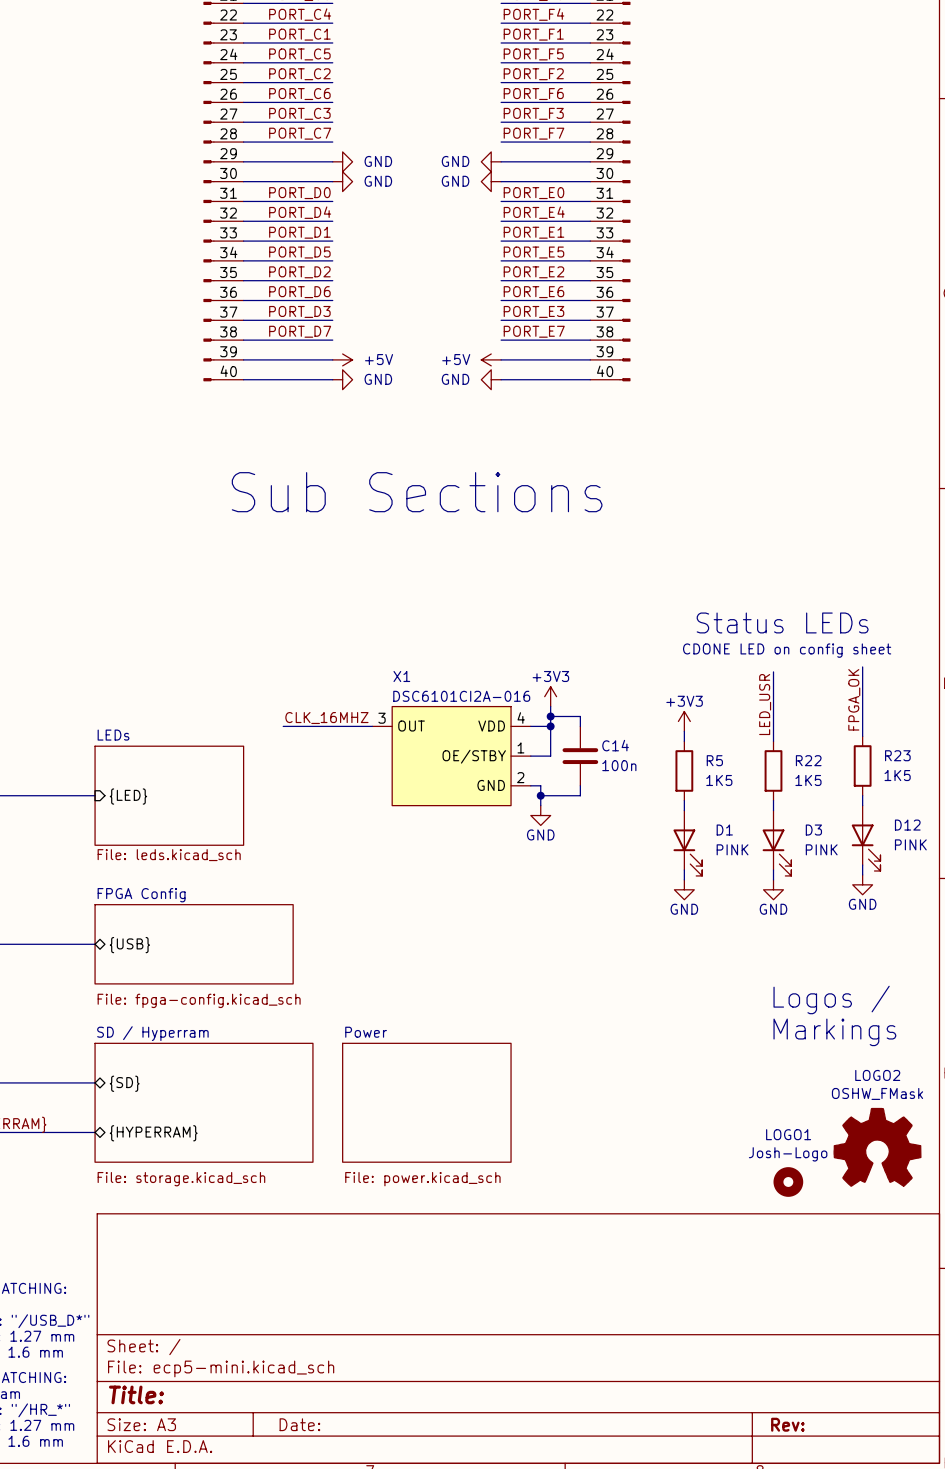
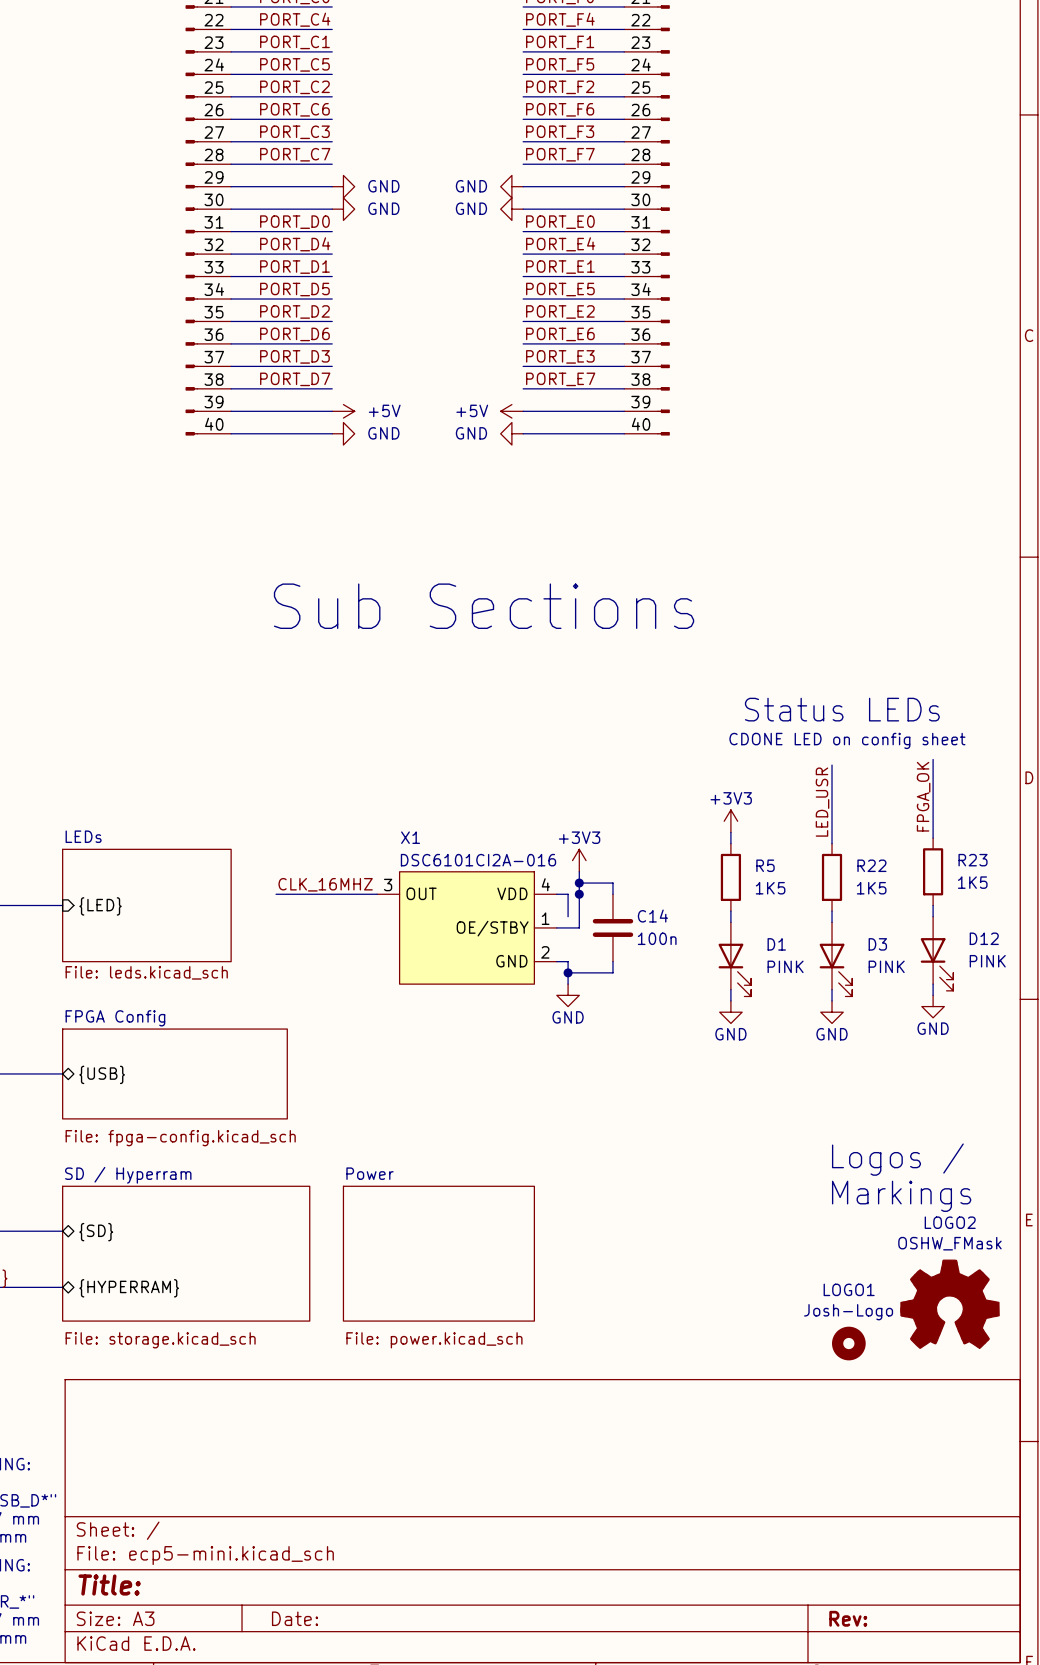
text position: Sub Sections (417, 492) -> Sub Sections (484, 606)
power symbol position: +3V3 (550, 696) -> +3V3 (579, 860)
wire: (550, 706) (550, 756) (530, 756) -> (579, 871) (579, 927) (556, 927)
wire: (550, 716) (580, 716) (580, 726) -> none
junction: (550, 716) -> none
label position: CLK_16MHZ (326, 718) -> CLK_16MHZ (325, 884)
wire: (283, 726) (372, 726) -> (276, 894) (377, 894)
wire: (530, 726) (550, 726) -> none
junction: (550, 726) -> none
X1 position: (451, 756) -> (466, 927)
C14 position: (580, 756) -> (612, 927)
junction: none -> (579, 883)
junction: none -> (579, 894)
wire: (580, 785) (580, 795) (540, 795) -> (612, 894) (612, 883) (579, 883)
junction: (540, 795) -> none
power symbol position: GND (540, 815) -> GND (568, 995)
wire: none -> (556, 961) (568, 961) (568, 984)
wire: none -> (612, 961) (612, 972) (568, 972)
junction: none -> (568, 972)
text position: Logos / (831, 999) -> Logos / (897, 1159)
text position: Markings (834, 1032) -> Markings (901, 1196)

